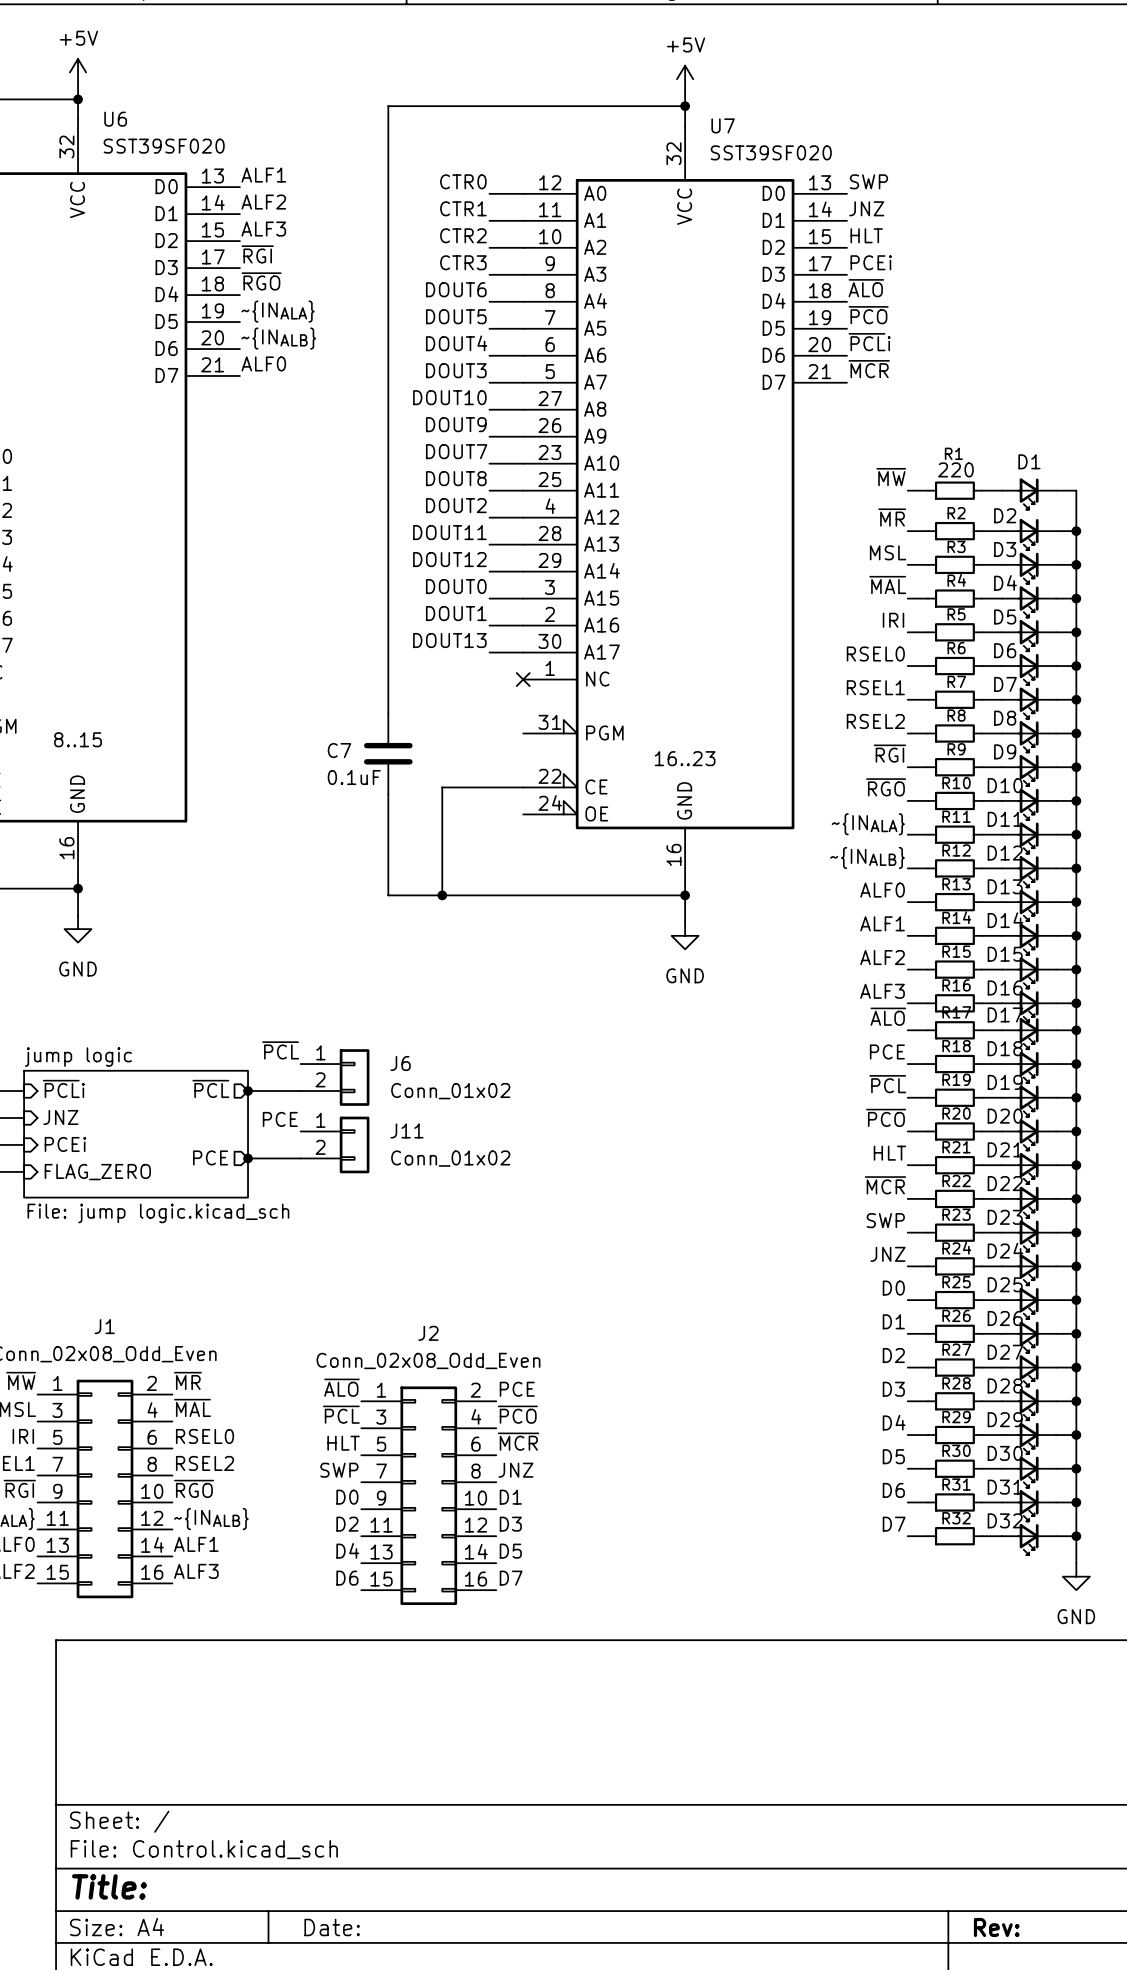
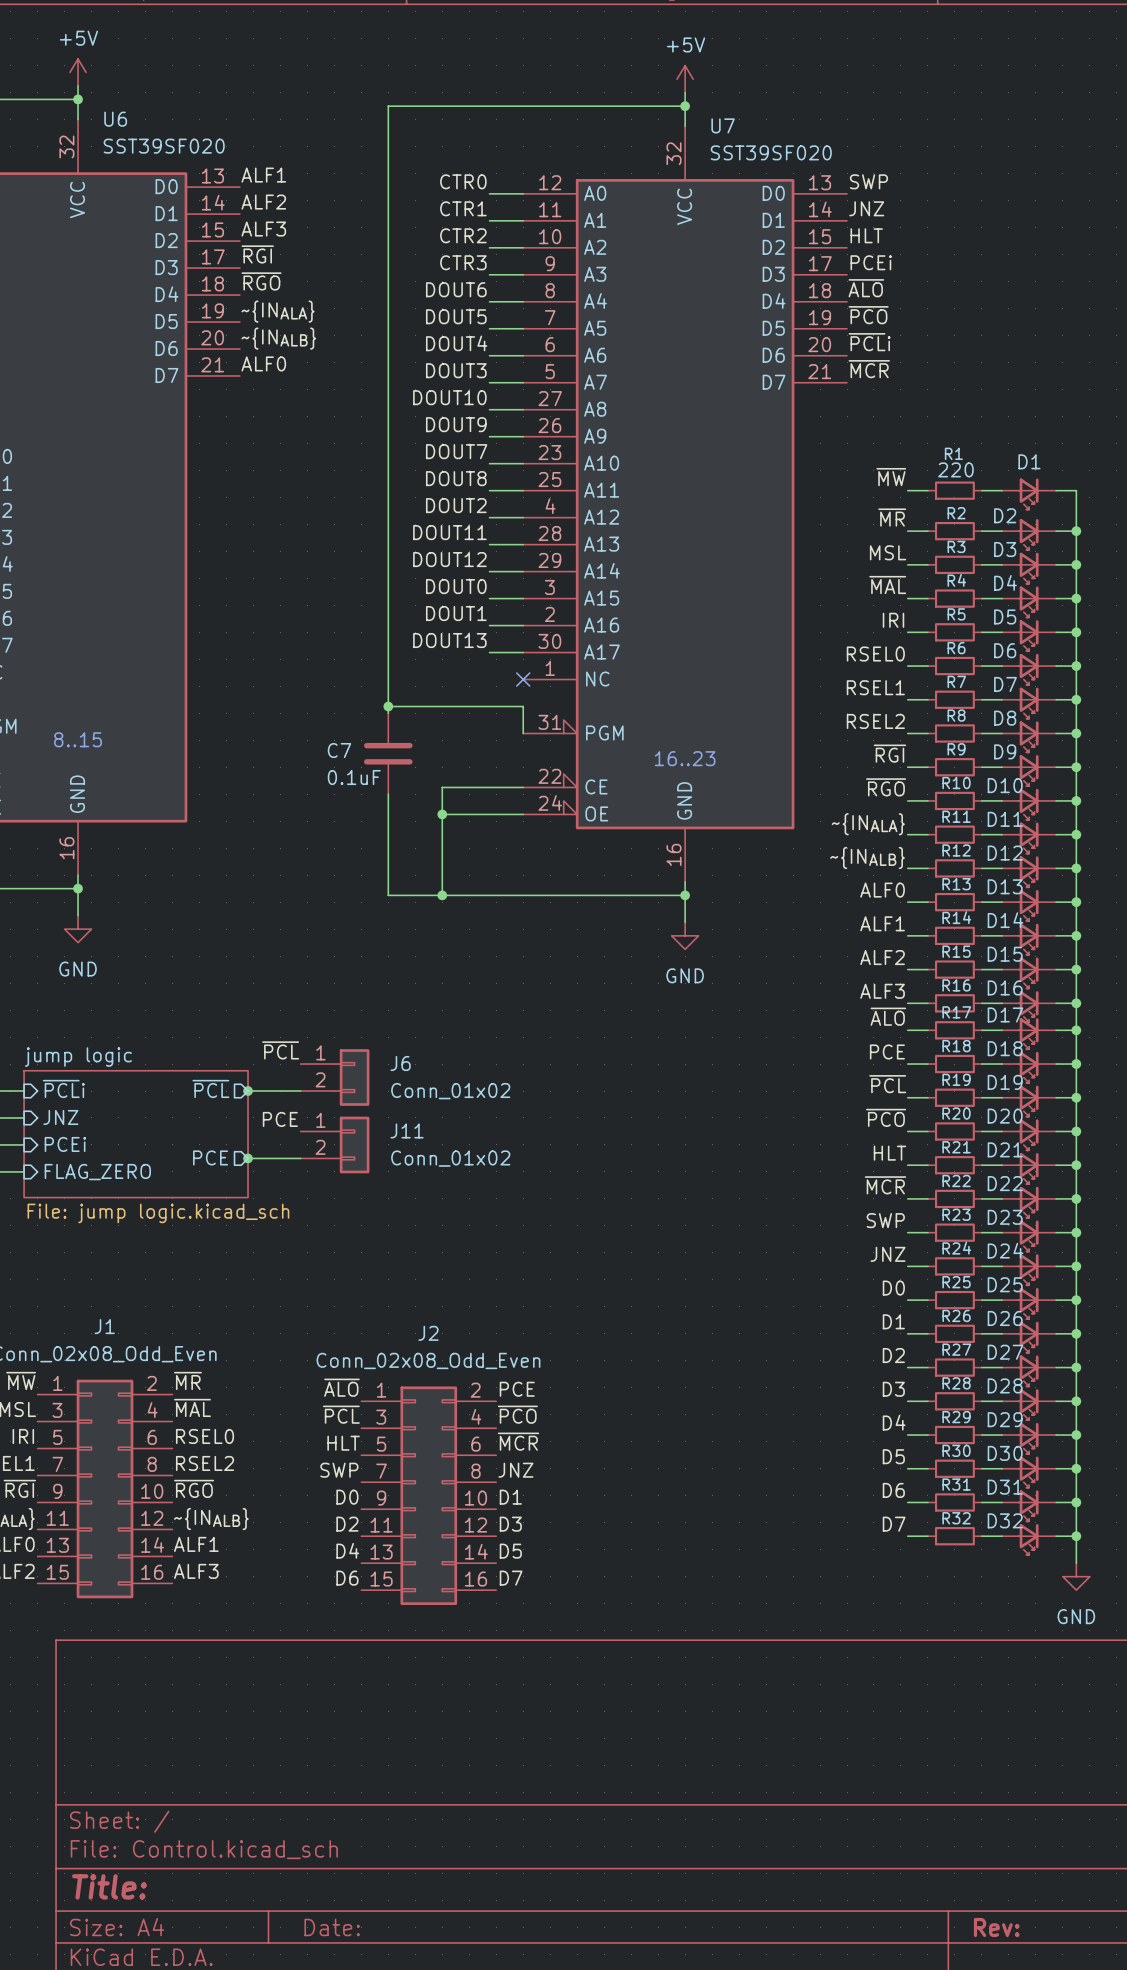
wire: none -> (388, 706) (523, 706) (523, 733)
junction: none -> (388, 706)
wire: none -> (442, 814) (523, 814)
junction: none -> (442, 814)

